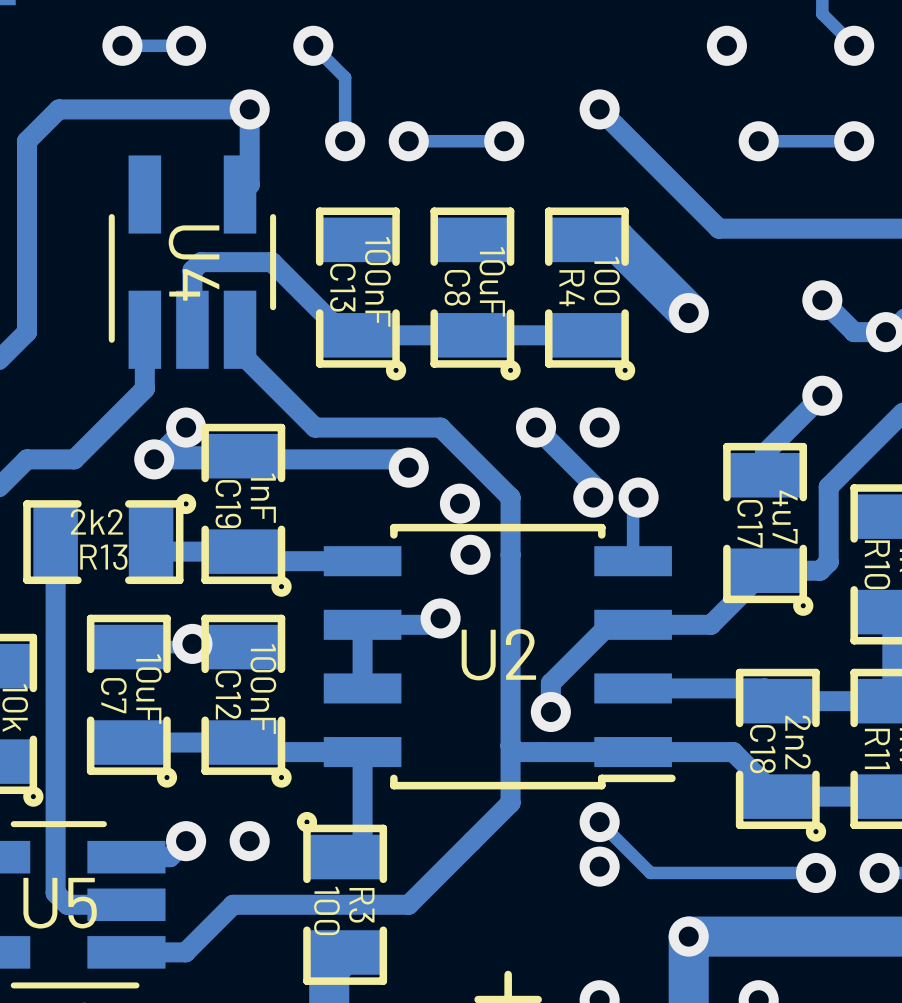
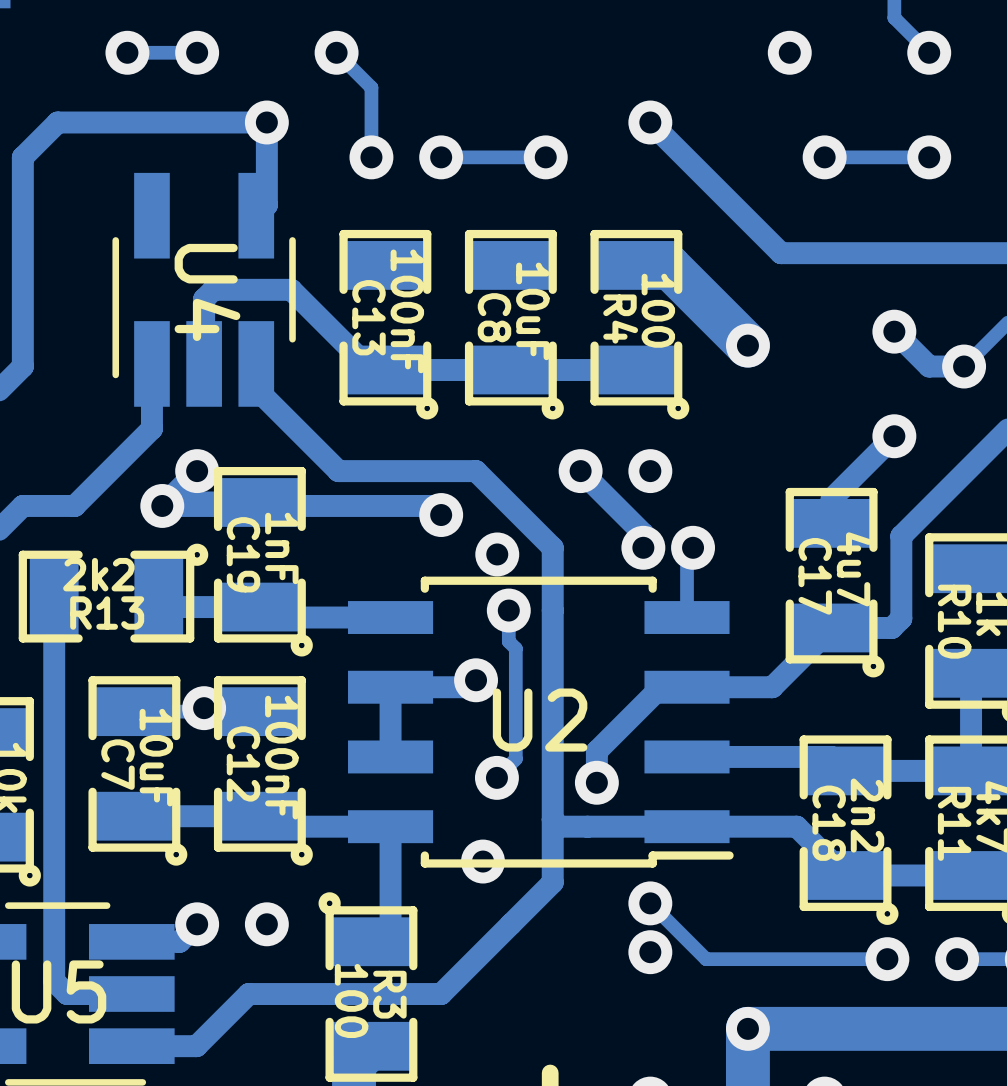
track: none -> (508, 610) (508, 641) (515, 648) (515, 758) (496, 777)
via: none -> (496, 777)
via: none -> (483, 861)

